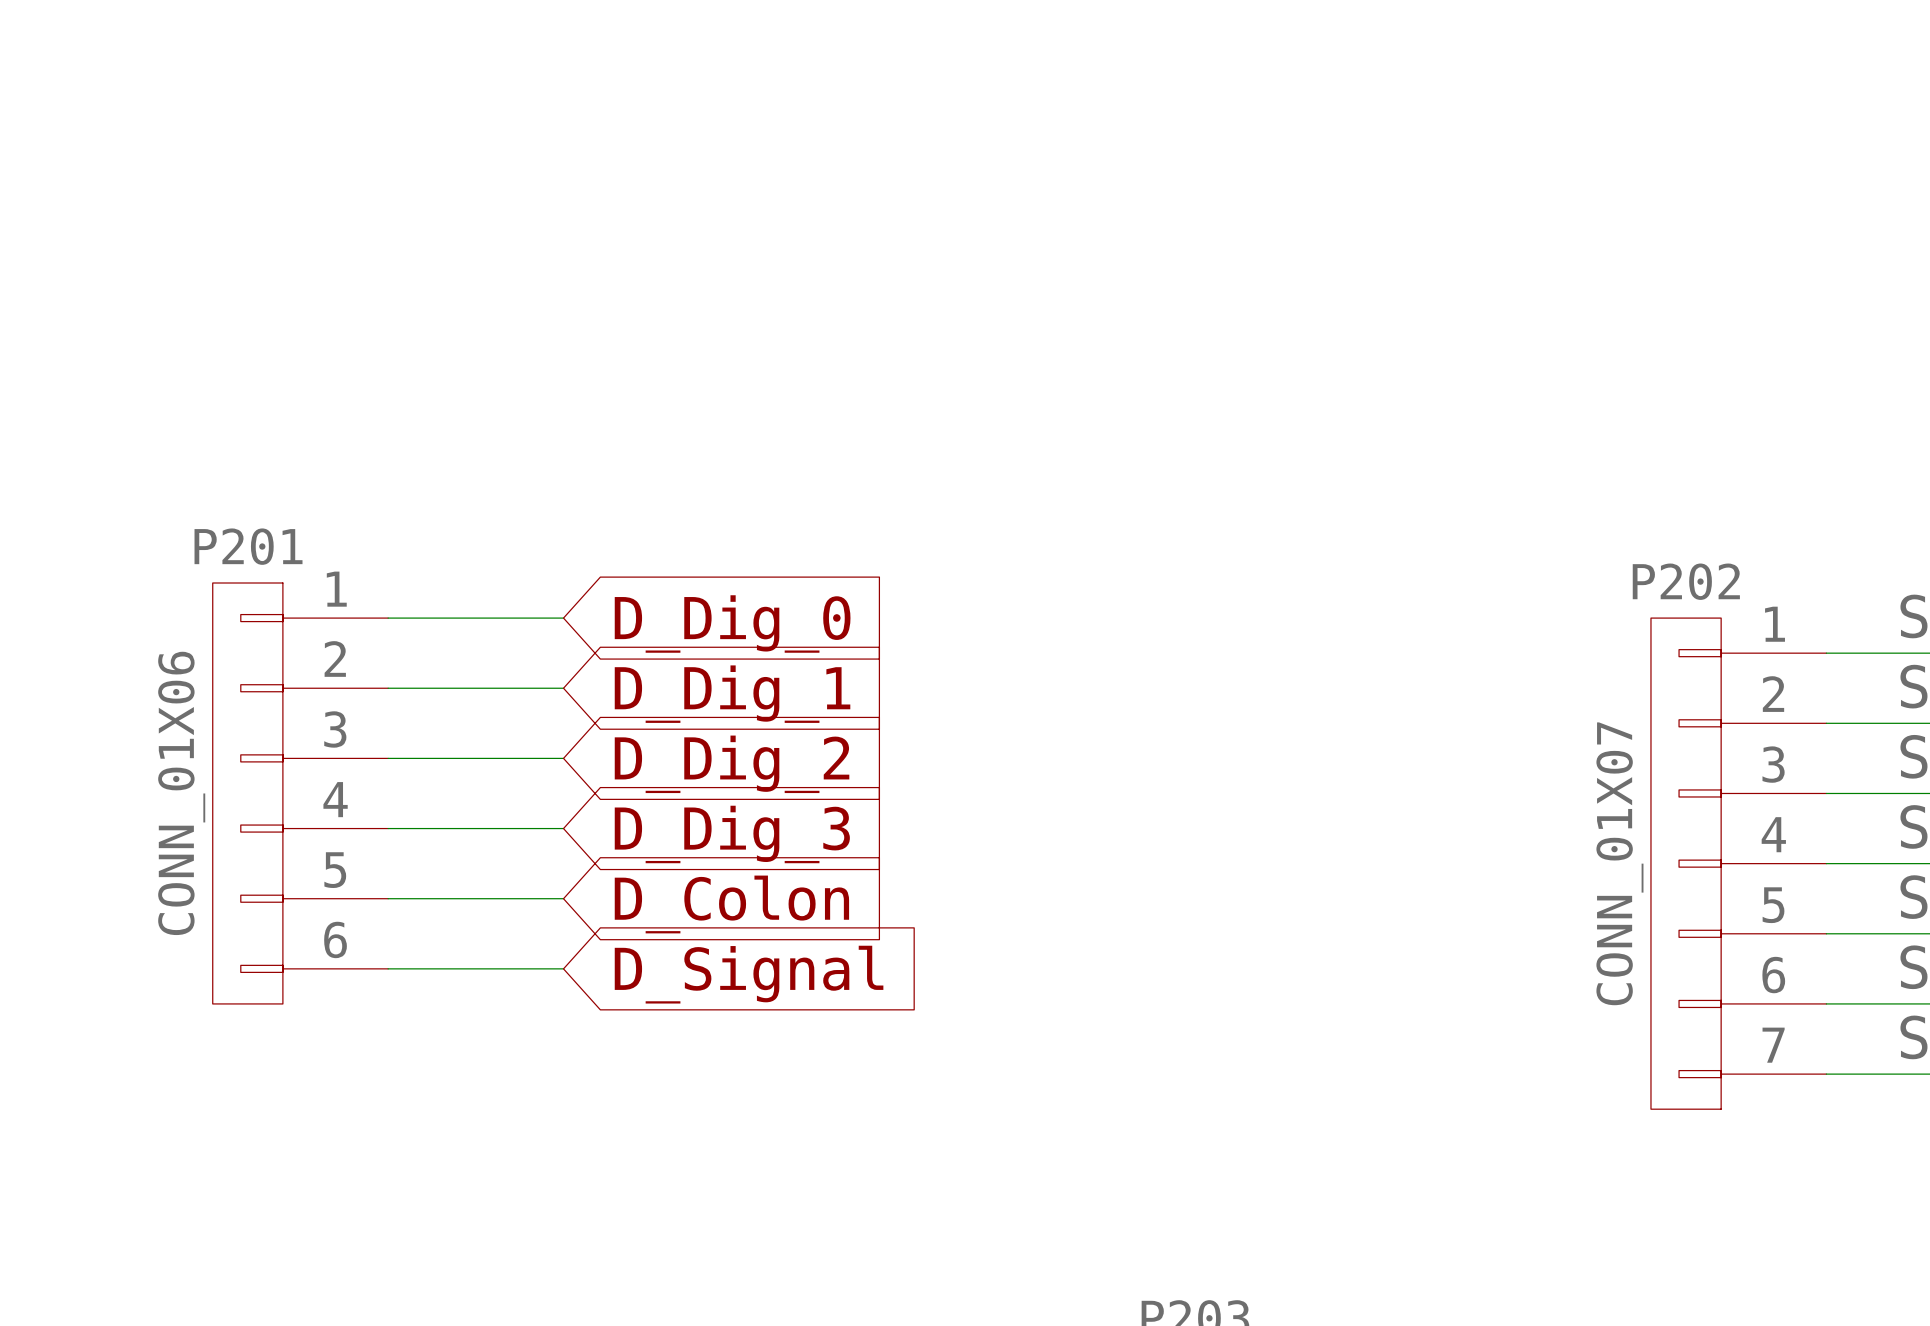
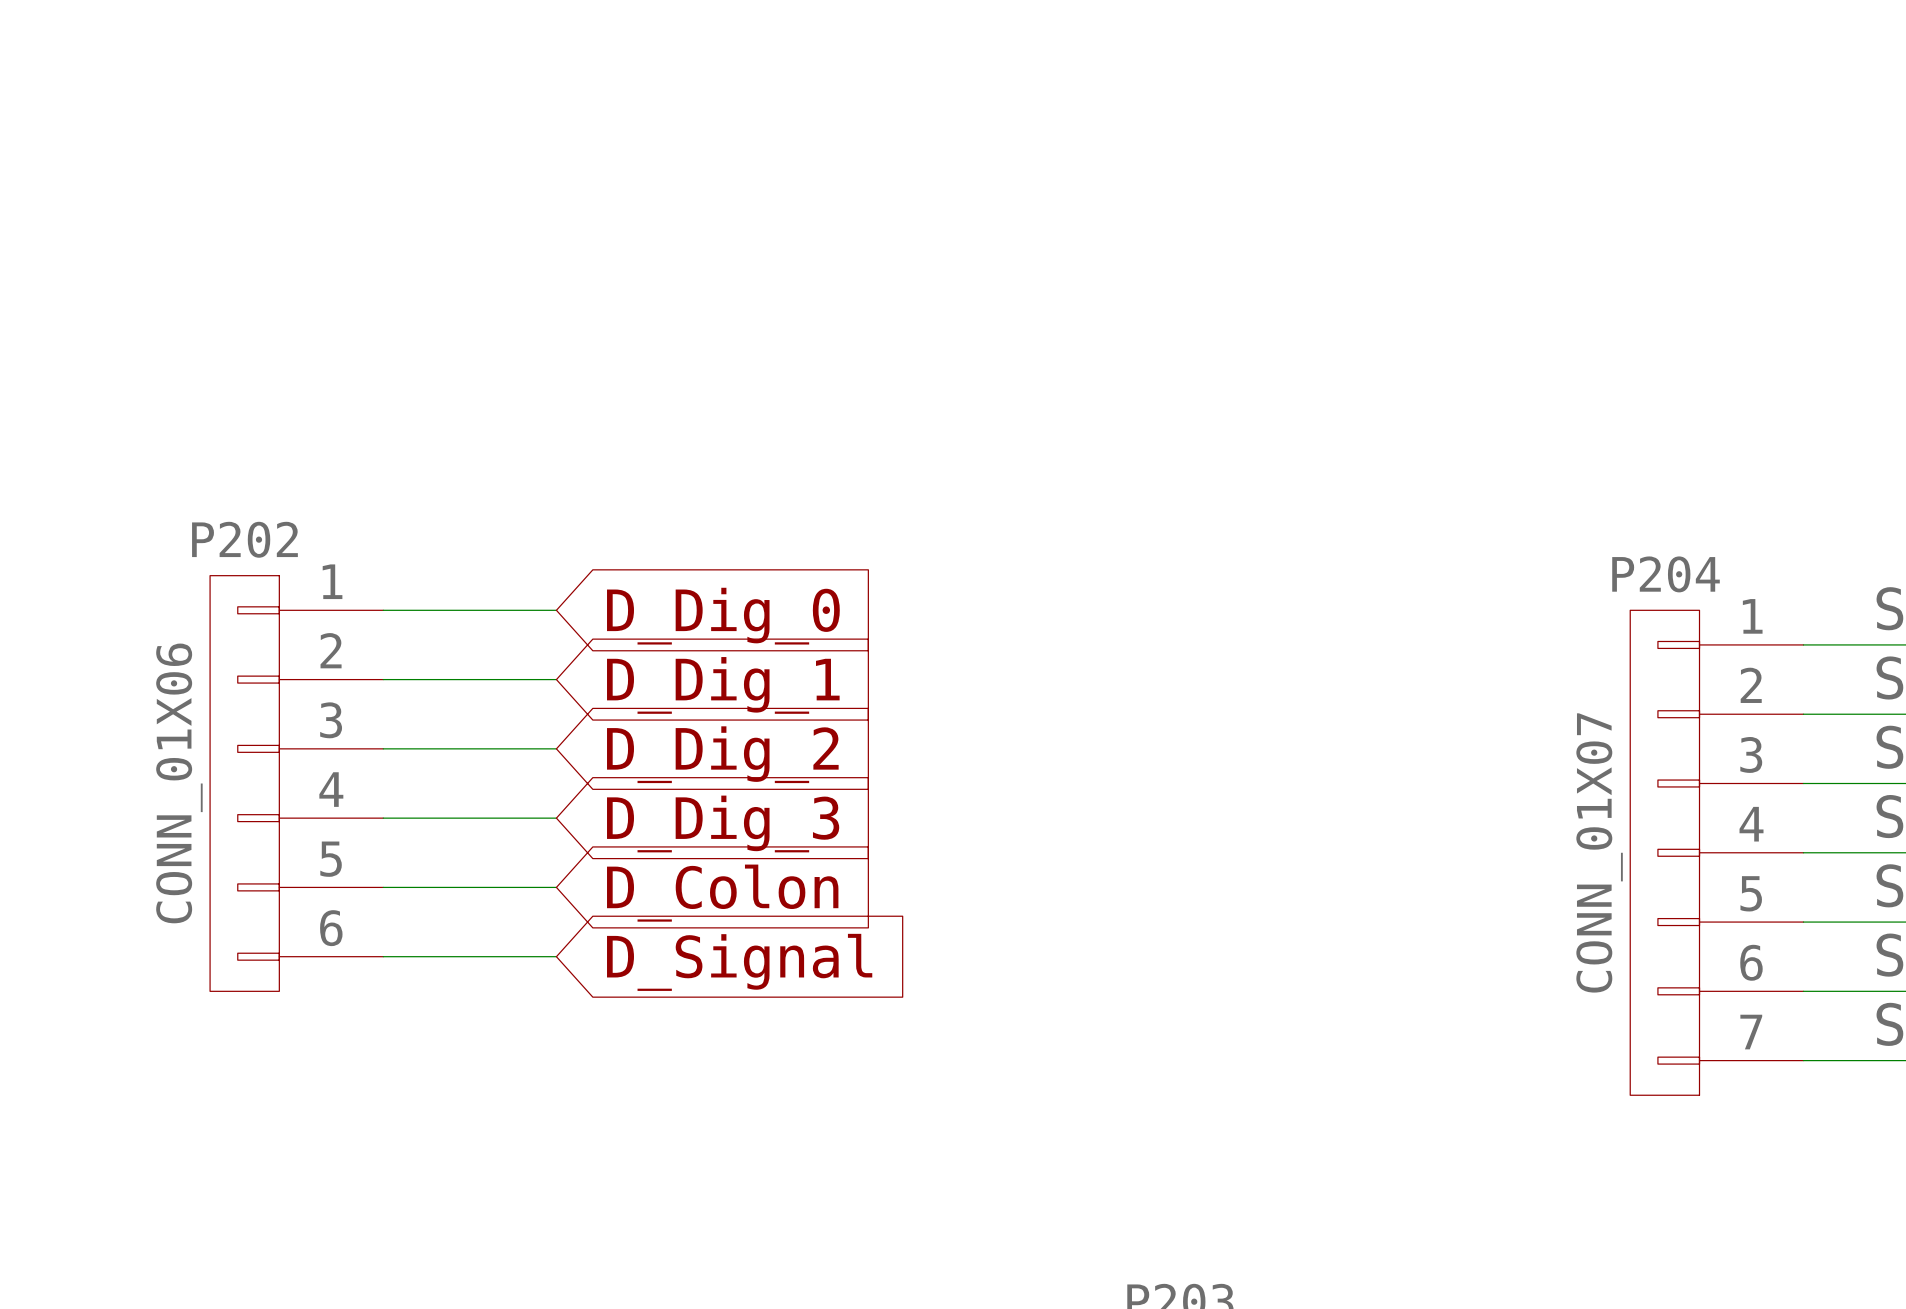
P201 name: P201 (248, 546) -> P202 (244, 539)
P202 name: P202 (1686, 581) -> P204 (1666, 574)

